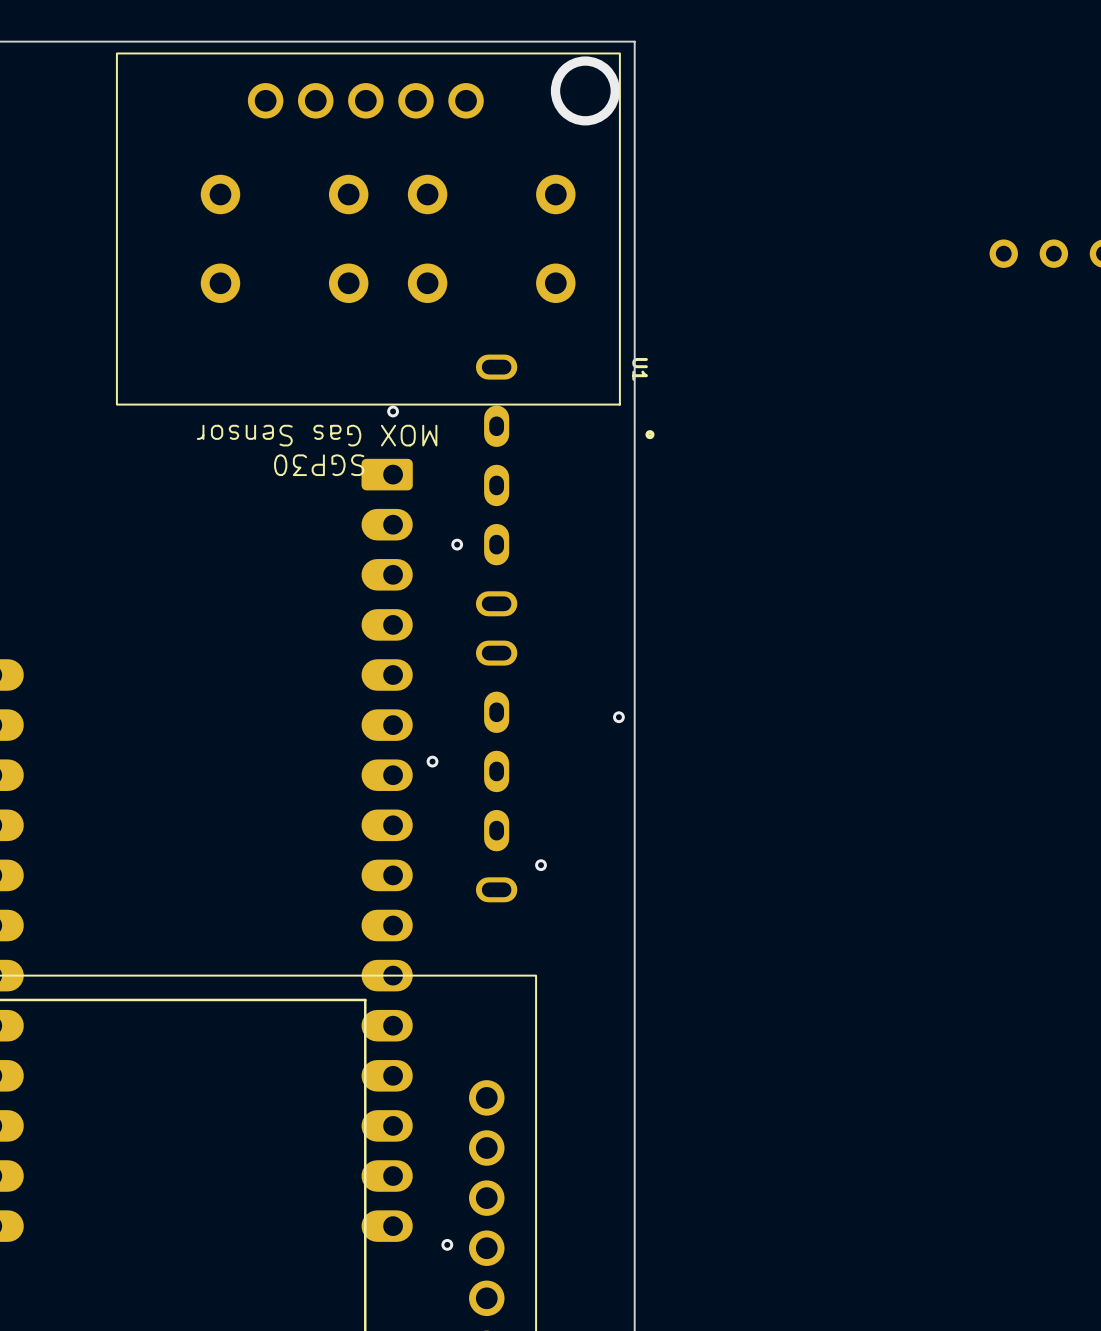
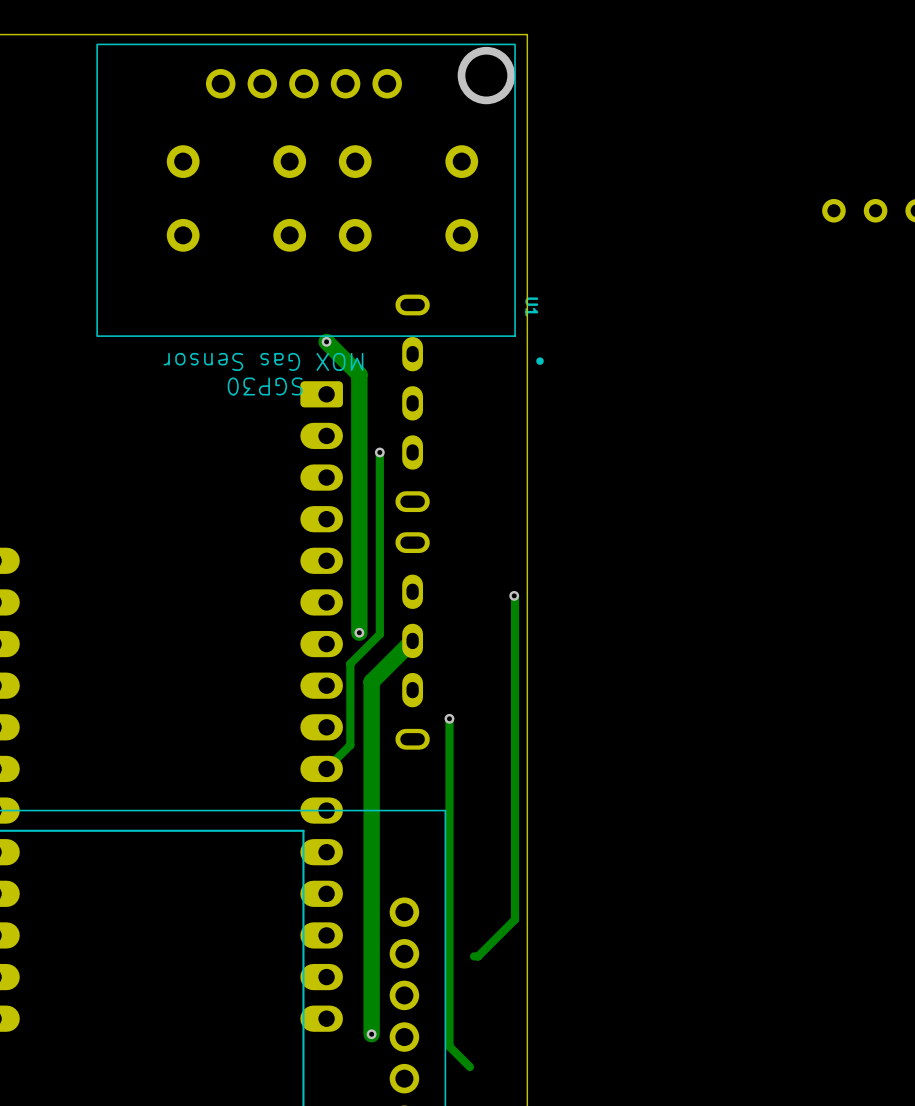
track: none -> (326, 341) (359, 374) (359, 632)
track: none -> (379, 452) (379, 634) (350, 663) (350, 745) (326, 768)
track: none -> (514, 595) (515, 919) (478, 956) (474, 956)
track: none -> (412, 640) (371, 681) (371, 1034)
track: none -> (449, 718) (449, 1046) (469, 1067)

